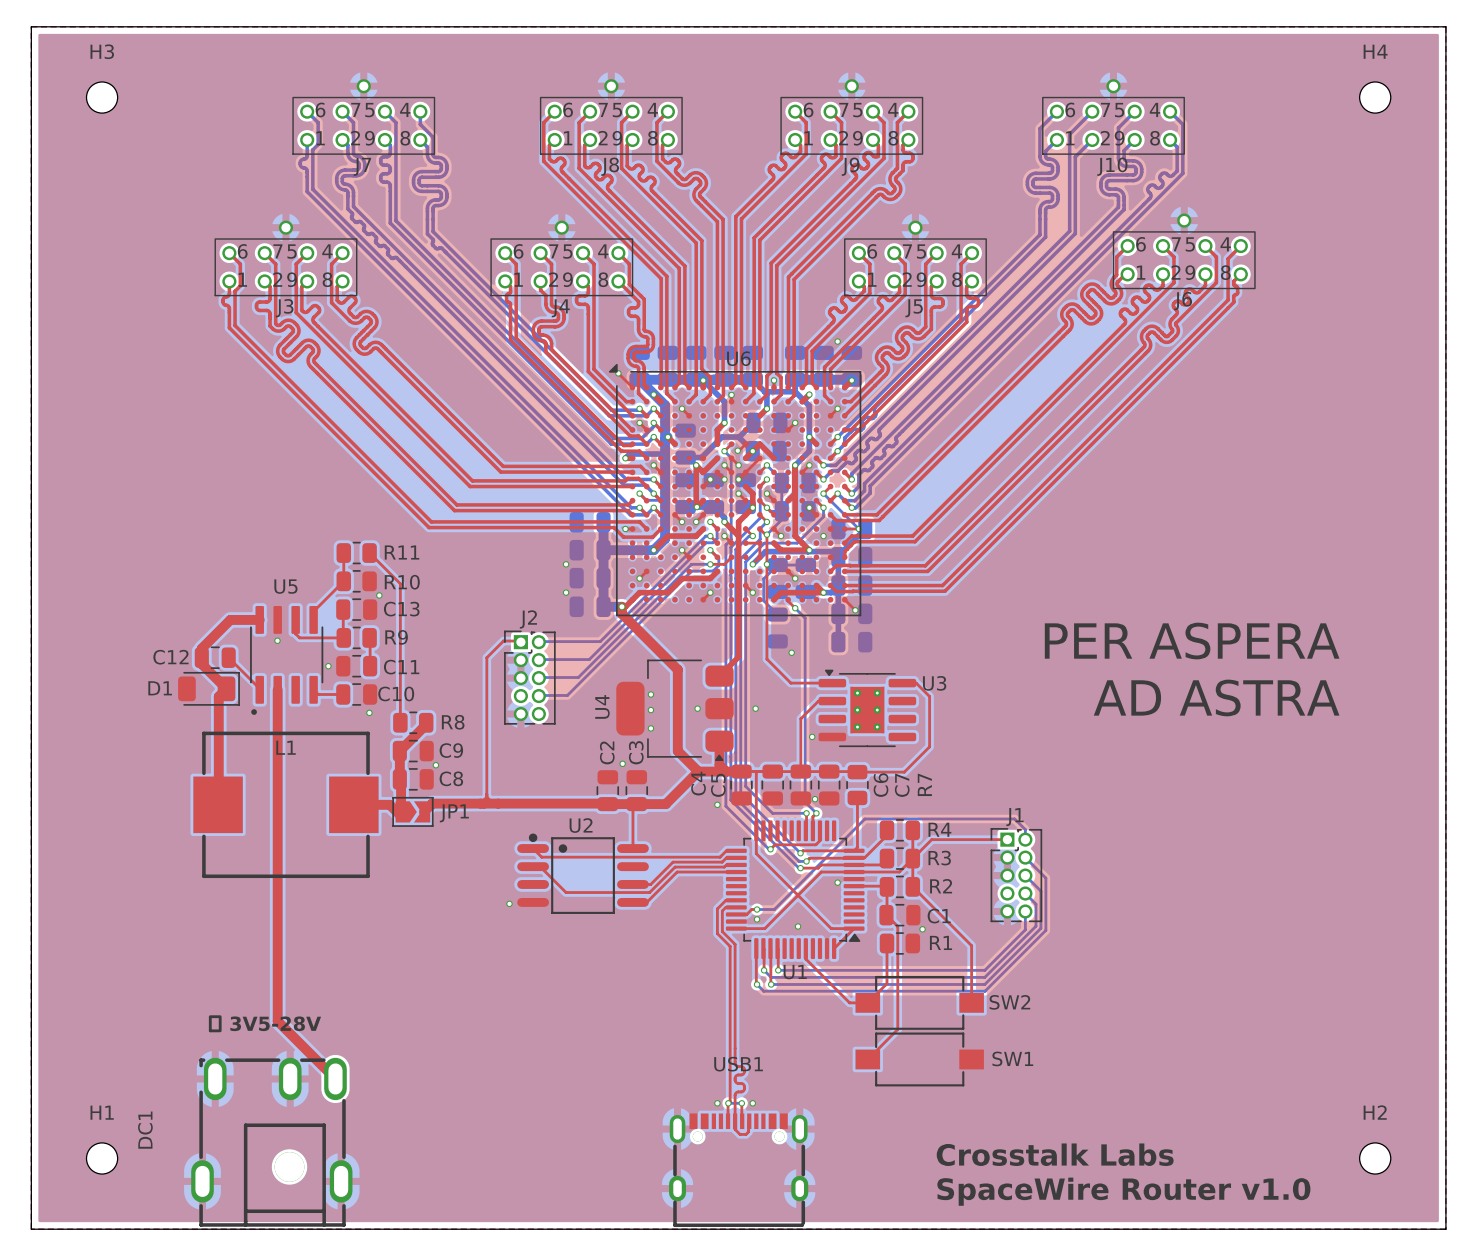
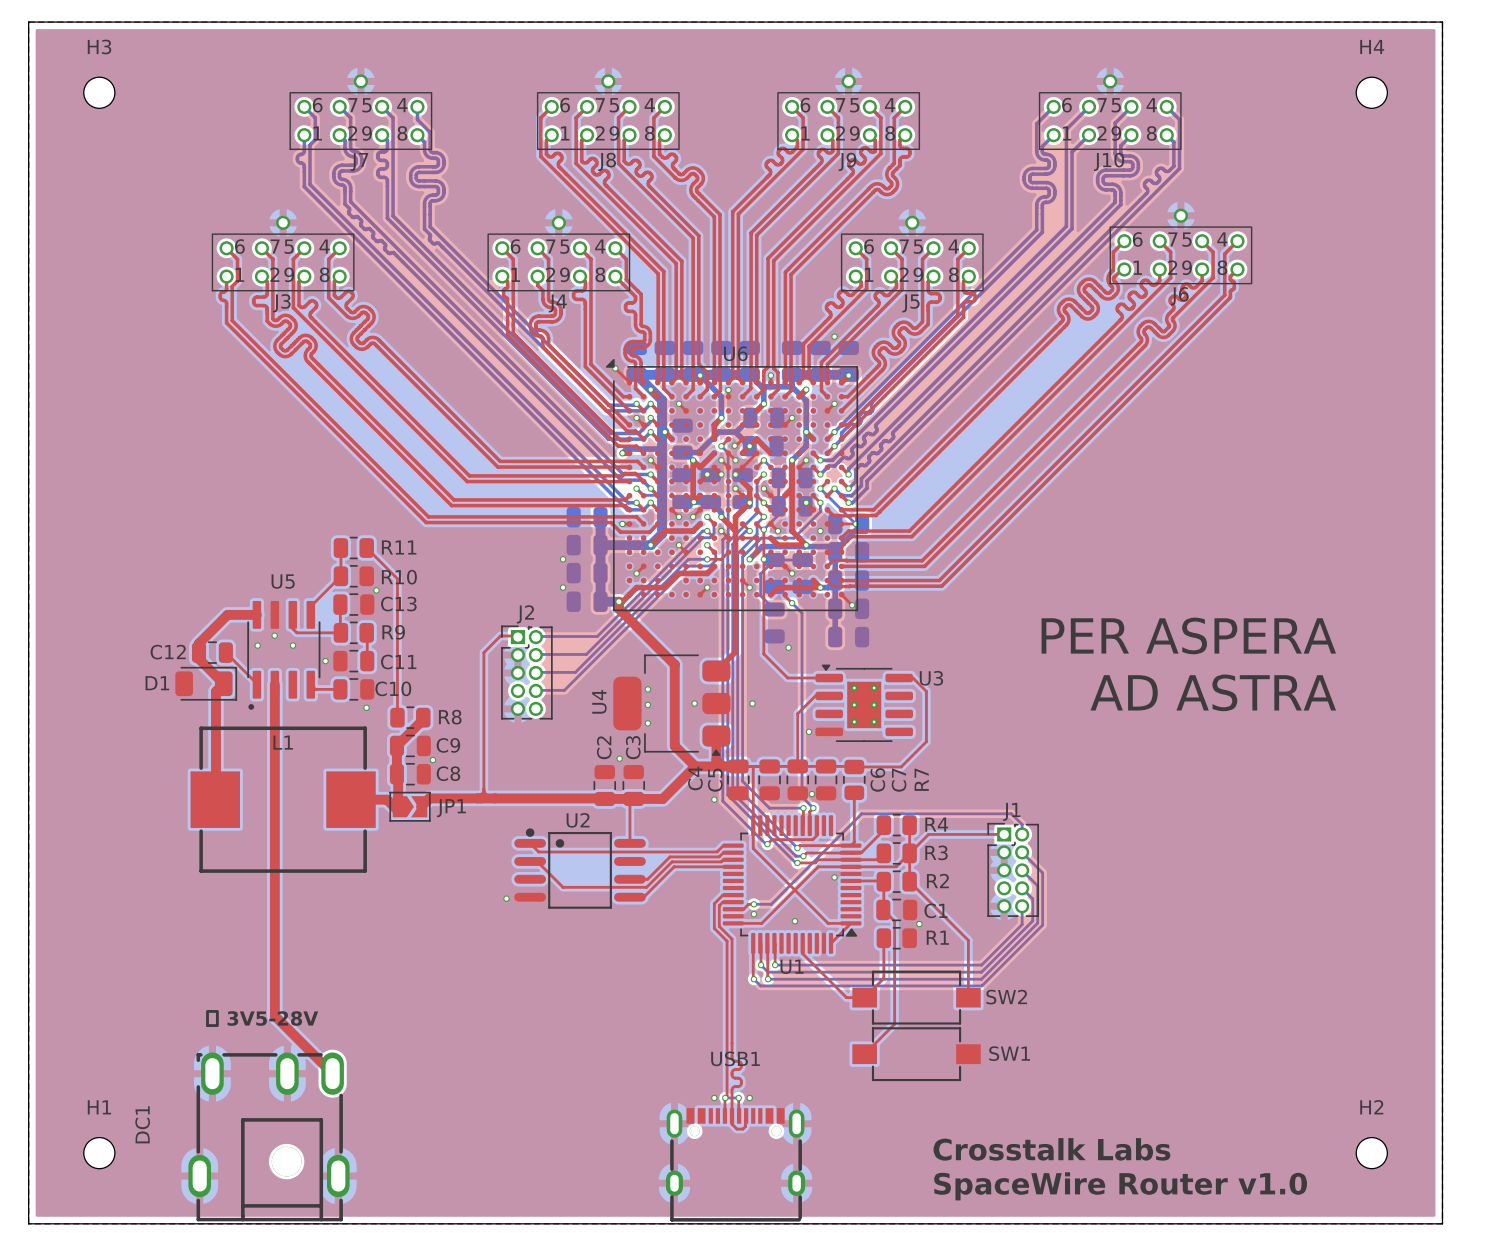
via: none -> (257, 645)
via: none -> (293, 645)

